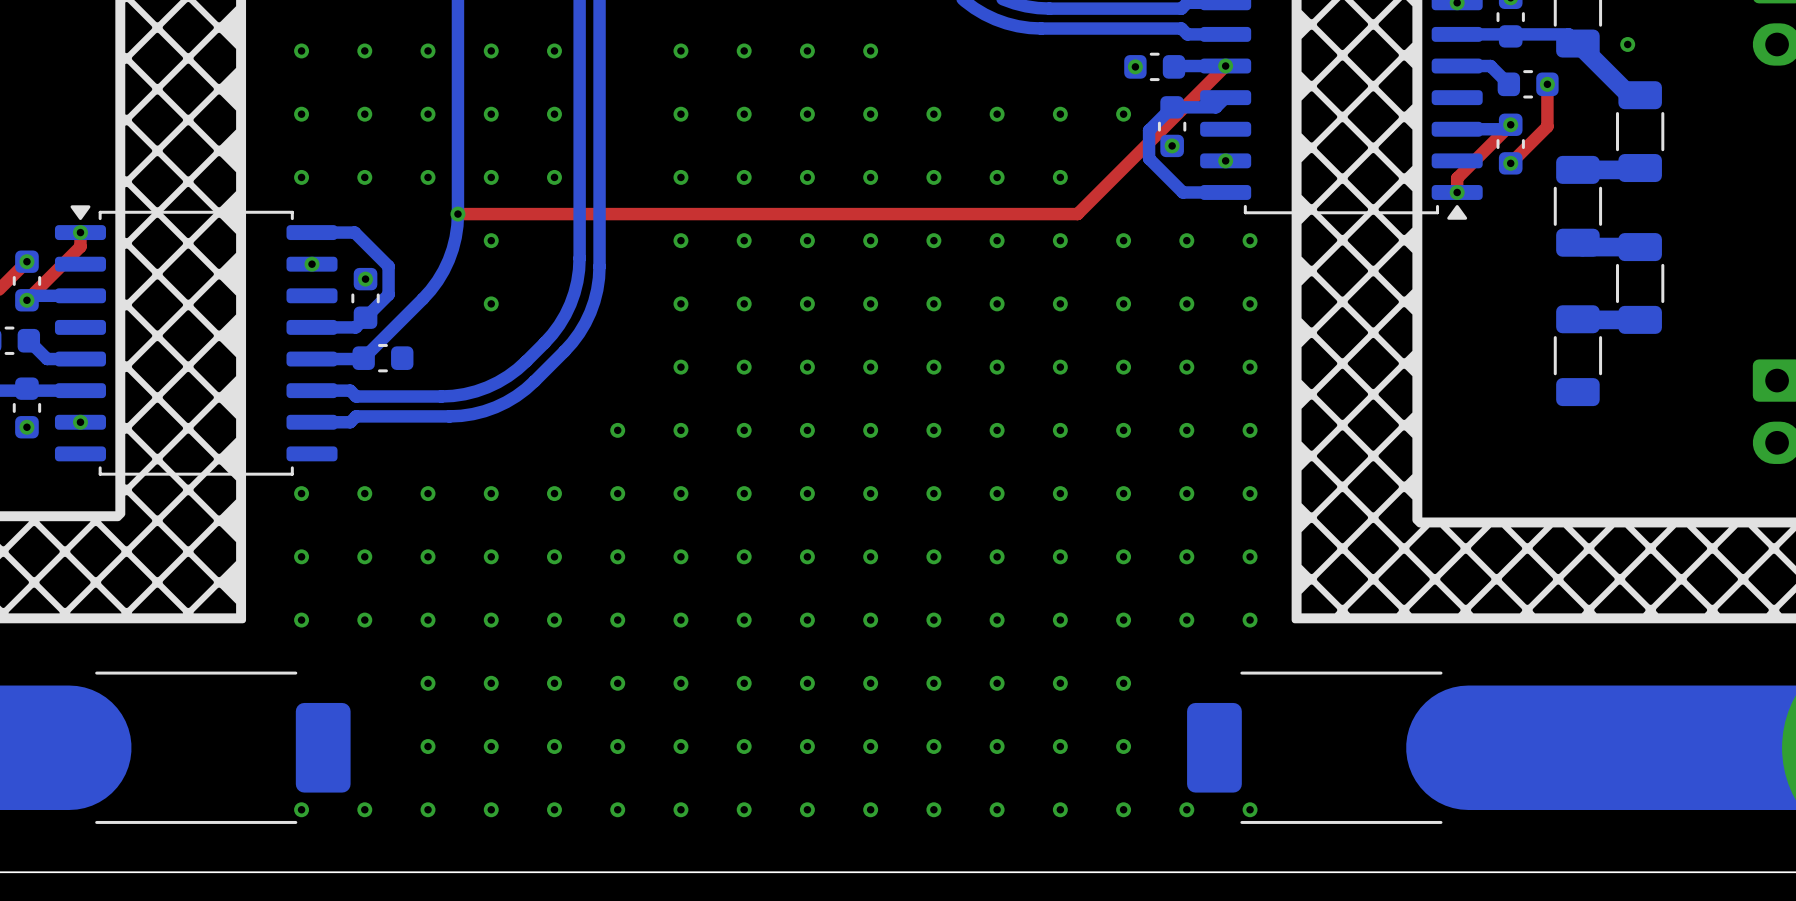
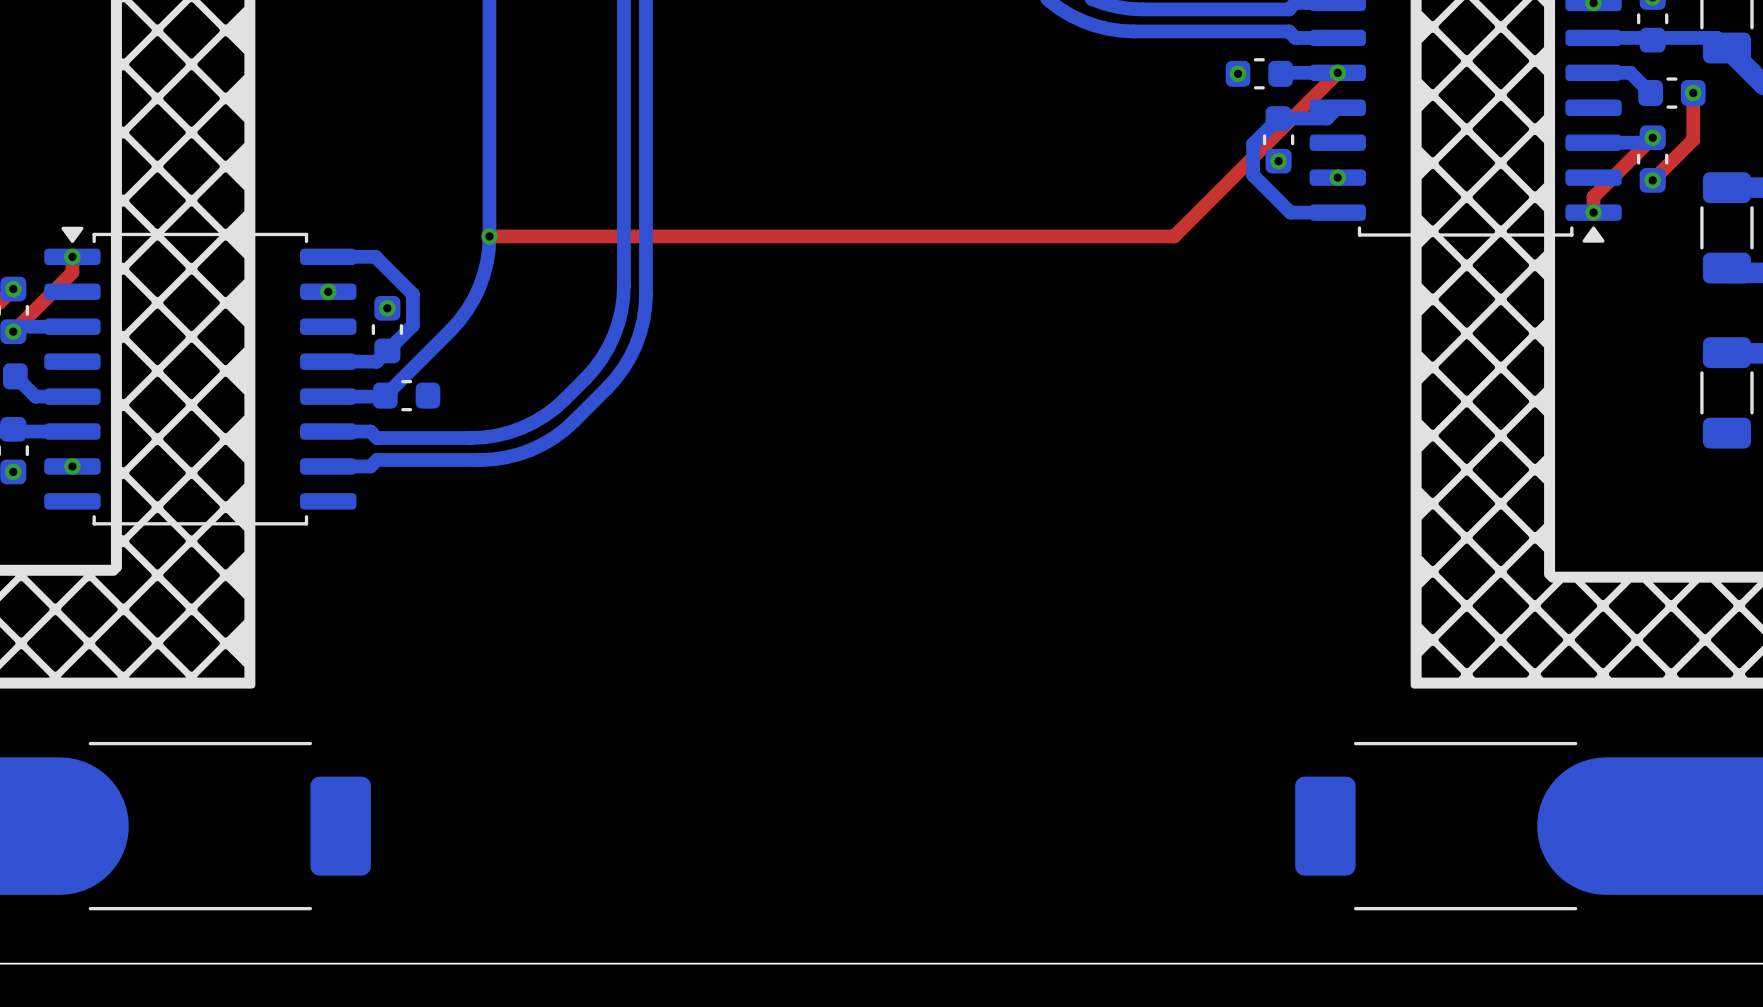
via: (301, 50) -> none
via: (364, 50) -> none
via: (428, 50) -> none
via: (491, 50) -> none
via: (554, 50) -> none
via: (680, 50) -> none
via: (744, 50) -> none
via: (807, 50) -> none
via: (870, 50) -> none
via: (301, 114) -> none
via: (364, 114) -> none
via: (428, 114) -> none
via: (491, 114) -> none
via: (554, 114) -> none
via: (680, 114) -> none
via: (744, 114) -> none
via: (807, 114) -> none
via: (870, 114) -> none
via: (933, 114) -> none
via: (997, 114) -> none
via: (1060, 114) -> none
via: (1123, 114) -> none
via: (301, 177) -> none
via: (364, 177) -> none
via: (428, 177) -> none
via: (491, 177) -> none
via: (554, 177) -> none
via: (680, 177) -> none
via: (744, 177) -> none
via: (807, 177) -> none
via: (870, 177) -> none
via: (933, 177) -> none
via: (997, 177) -> none
via: (1060, 177) -> none
via: (491, 240) -> none
via: (680, 240) -> none
via: (744, 240) -> none
via: (807, 240) -> none
via: (870, 240) -> none
via: (933, 240) -> none
via: (997, 240) -> none
via: (1060, 240) -> none
via: (1123, 240) -> none
via: (1186, 240) -> none
via: (1250, 240) -> none
via: (491, 303) -> none
via: (680, 303) -> none
via: (744, 303) -> none
via: (807, 303) -> none
via: (870, 303) -> none
via: (933, 303) -> none
via: (997, 303) -> none
via: (1060, 303) -> none
via: (1123, 303) -> none
via: (1186, 303) -> none
via: (1250, 303) -> none
via: (680, 367) -> none
via: (744, 367) -> none
via: (807, 367) -> none
via: (870, 367) -> none
via: (933, 367) -> none
via: (997, 367) -> none
via: (1060, 367) -> none
via: (1123, 367) -> none
via: (1186, 367) -> none
via: (1250, 367) -> none
via: (617, 430) -> none
via: (680, 430) -> none
via: (744, 430) -> none
via: (807, 430) -> none
via: (870, 430) -> none
via: (933, 430) -> none
via: (997, 430) -> none
via: (1060, 430) -> none
via: (1123, 430) -> none
via: (1186, 430) -> none
via: (1250, 430) -> none
via: (301, 493) -> none
via: (364, 493) -> none
via: (428, 493) -> none
via: (491, 493) -> none
via: (554, 493) -> none
via: (617, 493) -> none
via: (680, 493) -> none
via: (744, 493) -> none
via: (807, 493) -> none
via: (870, 493) -> none
via: (933, 493) -> none
via: (997, 493) -> none
via: (1060, 493) -> none
via: (1123, 493) -> none
via: (1186, 493) -> none
via: (1250, 493) -> none
via: (301, 556) -> none
via: (364, 556) -> none
via: (428, 556) -> none
via: (491, 556) -> none
via: (554, 556) -> none
via: (617, 556) -> none
via: (680, 556) -> none
via: (744, 556) -> none
via: (807, 556) -> none
via: (870, 556) -> none
via: (933, 556) -> none
via: (997, 556) -> none
via: (1060, 556) -> none
via: (1123, 556) -> none
via: (1186, 556) -> none
via: (1250, 556) -> none
via: (301, 620) -> none
via: (364, 620) -> none
via: (428, 620) -> none
via: (491, 620) -> none
via: (554, 620) -> none
via: (617, 620) -> none
via: (680, 620) -> none
via: (744, 620) -> none
via: (807, 620) -> none
via: (870, 620) -> none
via: (933, 620) -> none
via: (997, 620) -> none
via: (1060, 620) -> none
via: (1123, 620) -> none
via: (1186, 620) -> none
via: (1250, 620) -> none
via: (428, 683) -> none
via: (491, 683) -> none
via: (554, 683) -> none
via: (617, 683) -> none
via: (680, 683) -> none
via: (744, 683) -> none
via: (807, 683) -> none
via: (870, 683) -> none
via: (933, 683) -> none
via: (997, 683) -> none
via: (1060, 683) -> none
via: (1123, 683) -> none
via: (428, 746) -> none
via: (491, 746) -> none
via: (554, 746) -> none
via: (617, 746) -> none
via: (680, 746) -> none
via: (744, 746) -> none
via: (807, 746) -> none
via: (870, 746) -> none
via: (933, 746) -> none
via: (997, 746) -> none
via: (1060, 746) -> none
via: (1123, 746) -> none
via: (301, 809) -> none
via: (364, 809) -> none
via: (428, 809) -> none
via: (491, 809) -> none
via: (554, 809) -> none
via: (617, 809) -> none
via: (680, 809) -> none
via: (744, 809) -> none
via: (807, 809) -> none
via: (870, 809) -> none
via: (933, 809) -> none
via: (997, 809) -> none
via: (1060, 809) -> none
via: (1123, 809) -> none
via: (1186, 809) -> none
via: (1250, 809) -> none

